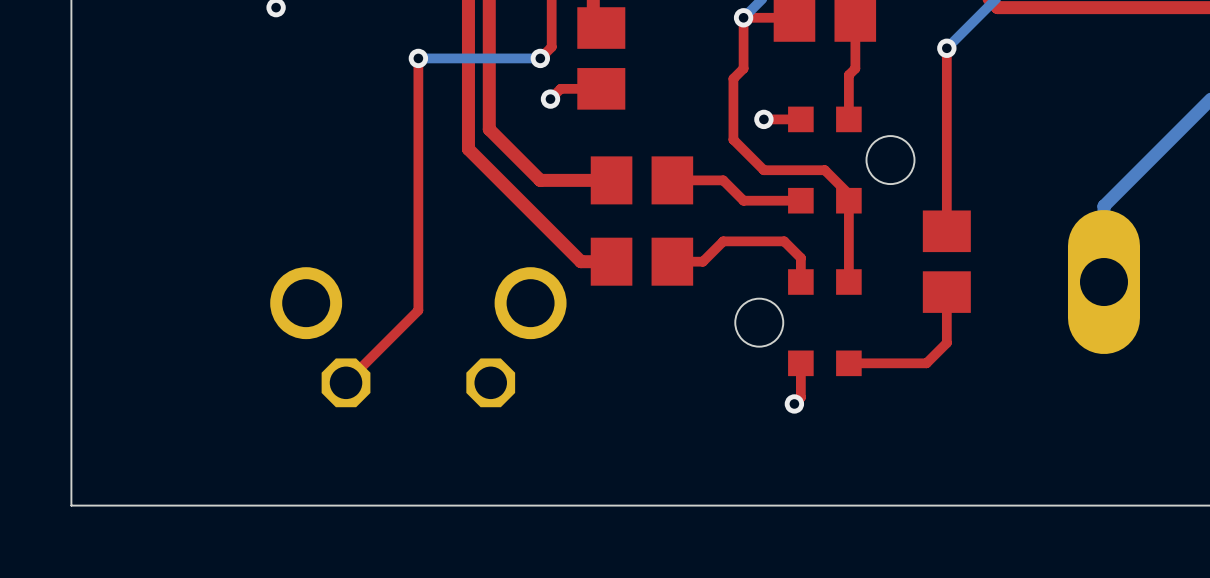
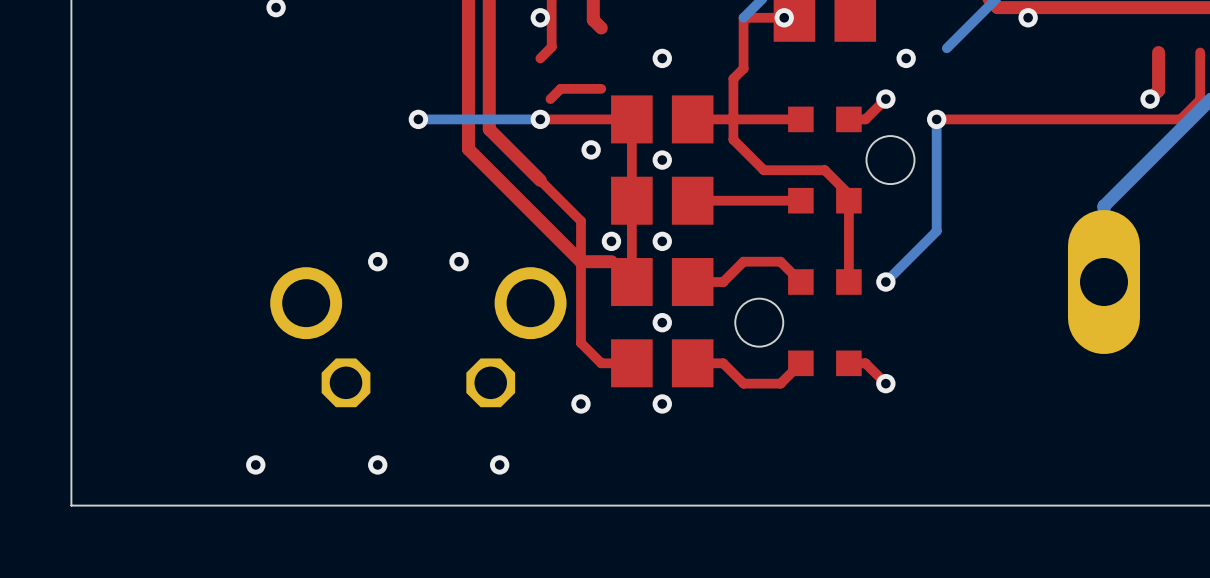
via: none -> (540, 17)
via position: (743, 17) -> (784, 17)
top track: (855, 17) (855, 68) (848, 75) (848, 119) -> (885, 99) (865, 119) (848, 119)
via: none -> (1028, 17)
top track: (946, 48) (946, 231) -> none
via: (946, 48) -> none
top track: none -> (1158, 52) (1158, 90) (1150, 99)
top track: none -> (1200, 52) (1200, 99) (1180, 119) (936, 119)
top track: (418, 58) (418, 310) (346, 382) -> none
via position: (418, 58) -> (418, 119)
bottom track: (540, 58) (418, 58) -> (540, 119) (418, 119)
via: (540, 58) -> none
part rotation: 0° (601, 58) -> 90° clockwise (662, 119)
part position: (601, 58) -> (662, 119)
via: none -> (662, 58)
via: none -> (906, 58)
via position: (550, 99) -> (540, 119)
via: none -> (885, 99)
via: none -> (1150, 99)
top track: none -> (540, 119) (631, 119) (631, 282)
top track: none -> (763, 119) (692, 119)
via: (763, 119) -> none
bottom track: none -> (936, 119) (936, 231) (885, 282)
via: none -> (936, 119)
via: none -> (591, 149)
via: none -> (662, 160)
top track: (611, 180) (540, 180) -> (631, 363) (601, 363) (580, 342) (580, 221) (540, 180)
part position: (641, 180) -> (662, 200)
top track: (672, 180) (723, 180) (743, 200) -> (692, 200) (743, 200)
via: none -> (611, 241)
via: none -> (662, 241)
via: none -> (377, 261)
via: none -> (459, 261)
part position: (641, 261) -> (662, 282)
top track: (672, 261) (702, 261) (723, 241) (784, 241) (800, 258) (800, 282) -> (692, 282) (723, 282) (743, 261) (780, 261) (800, 282)
part: (946, 261) -> none
via: none -> (885, 282)
top track: (946, 292) (946, 342) (926, 363) (865, 363) -> (885, 383) (865, 363)
via: none -> (662, 322)
part: none -> (662, 363)
top track: (800, 363) (800, 397) (794, 403) -> (800, 363) (780, 383) (743, 383) (723, 363) (692, 363)
via: none -> (885, 383)
via: none -> (580, 403)
via: none -> (662, 403)
via: (794, 403) -> none
via: none -> (255, 464)
via: none -> (377, 464)
via: none -> (499, 464)

